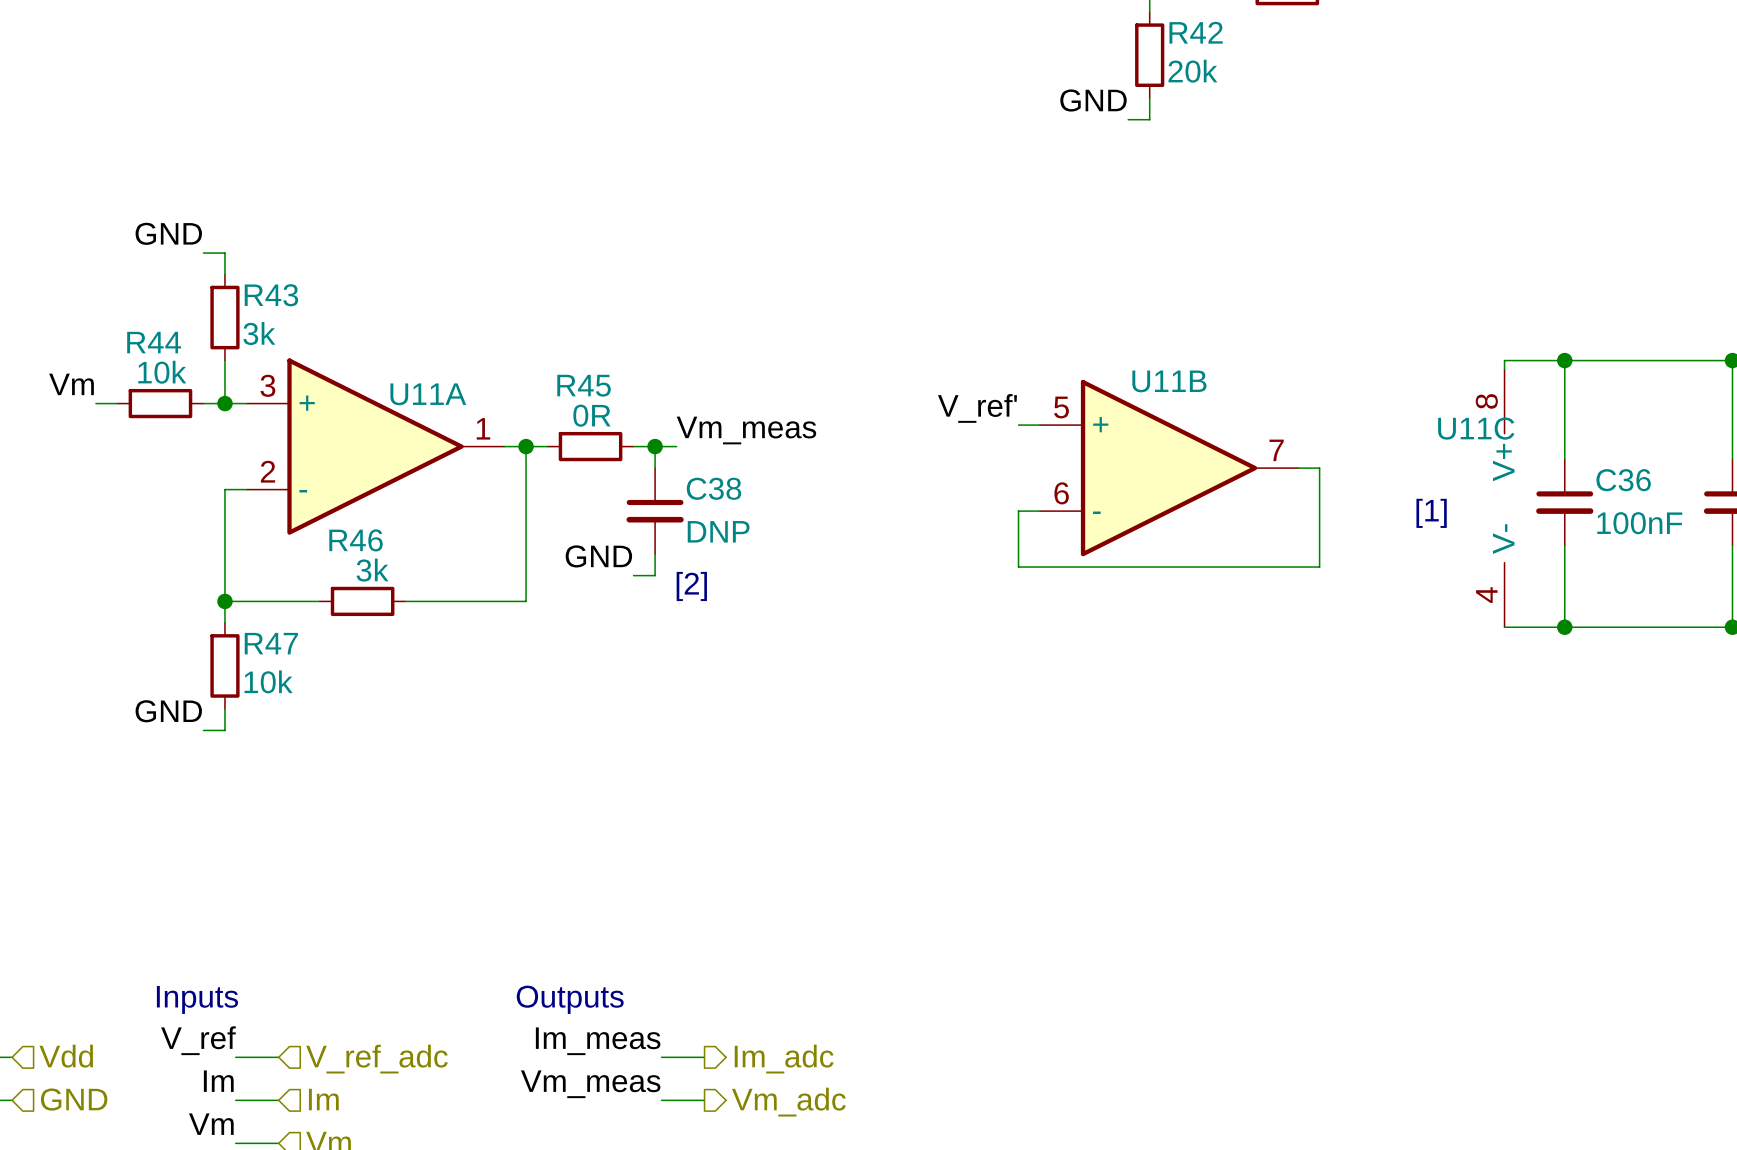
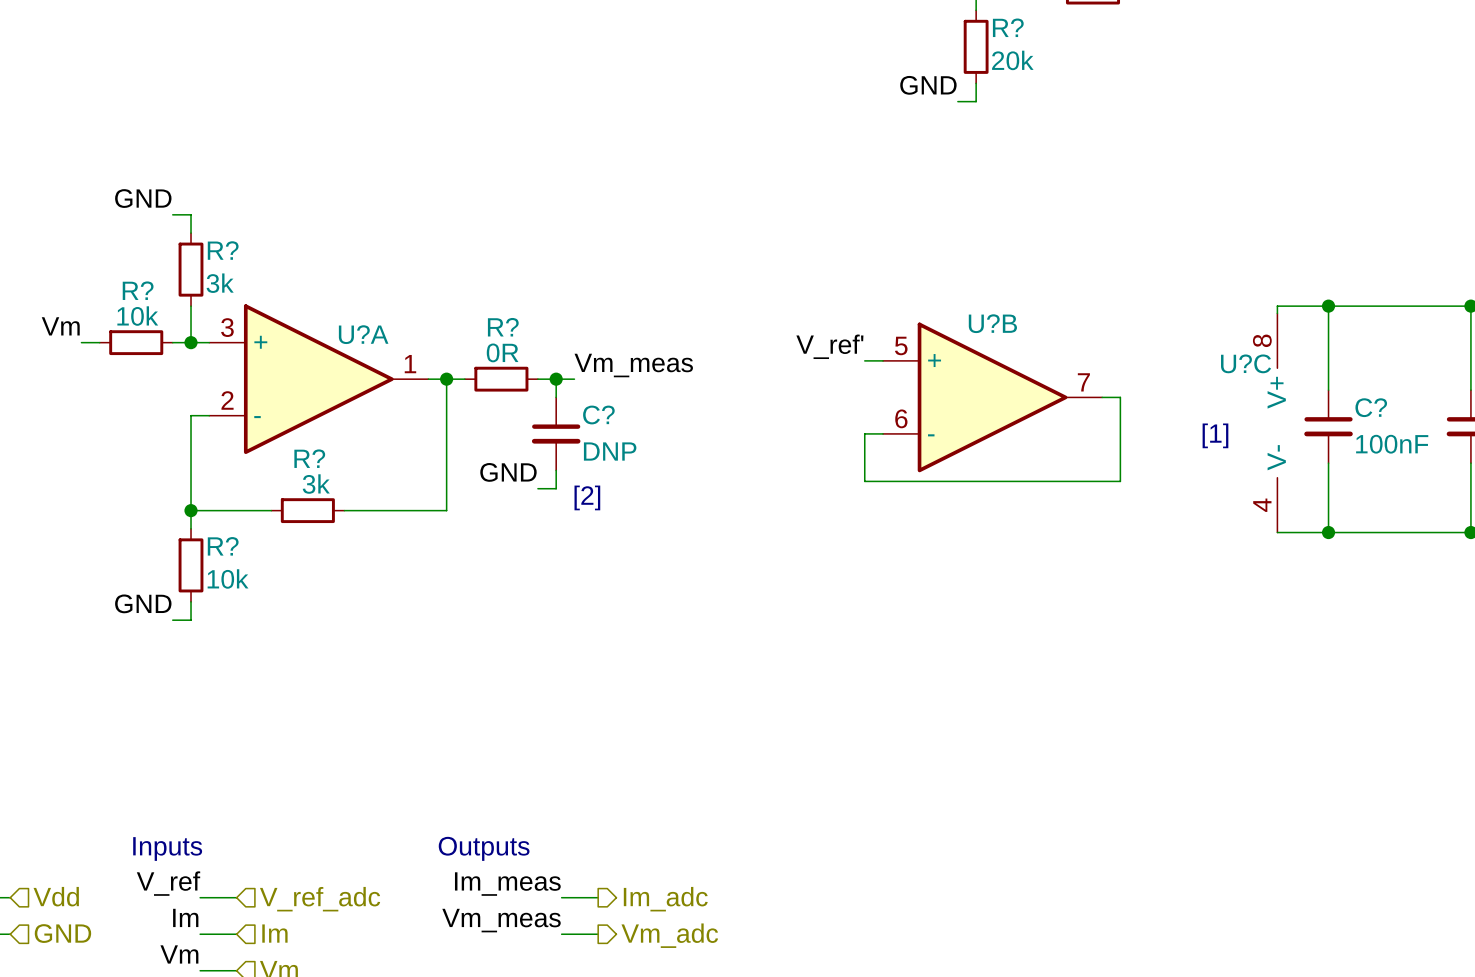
R42 name: R42 (1196, 32) -> R? (1008, 27)
R43 name: R43 (271, 295) -> R? (223, 250)
R44 name: R44 (154, 342) -> R? (138, 290)
U11B name: U11B (1169, 381) -> U?B (992, 323)
R45 name: R45 (584, 385) -> R? (503, 327)
U11A name: U11A (428, 394) -> U?A (363, 334)
U11C name: U11C (1476, 428) -> U?C (1246, 363)
C36 name: C36 (1623, 480) -> C? (1371, 407)
C38 name: C38 (713, 488) -> C? (598, 414)
R46 name: R46 (356, 540) -> R? (309, 458)
R47 name: R47 (271, 643) -> R? (223, 546)

